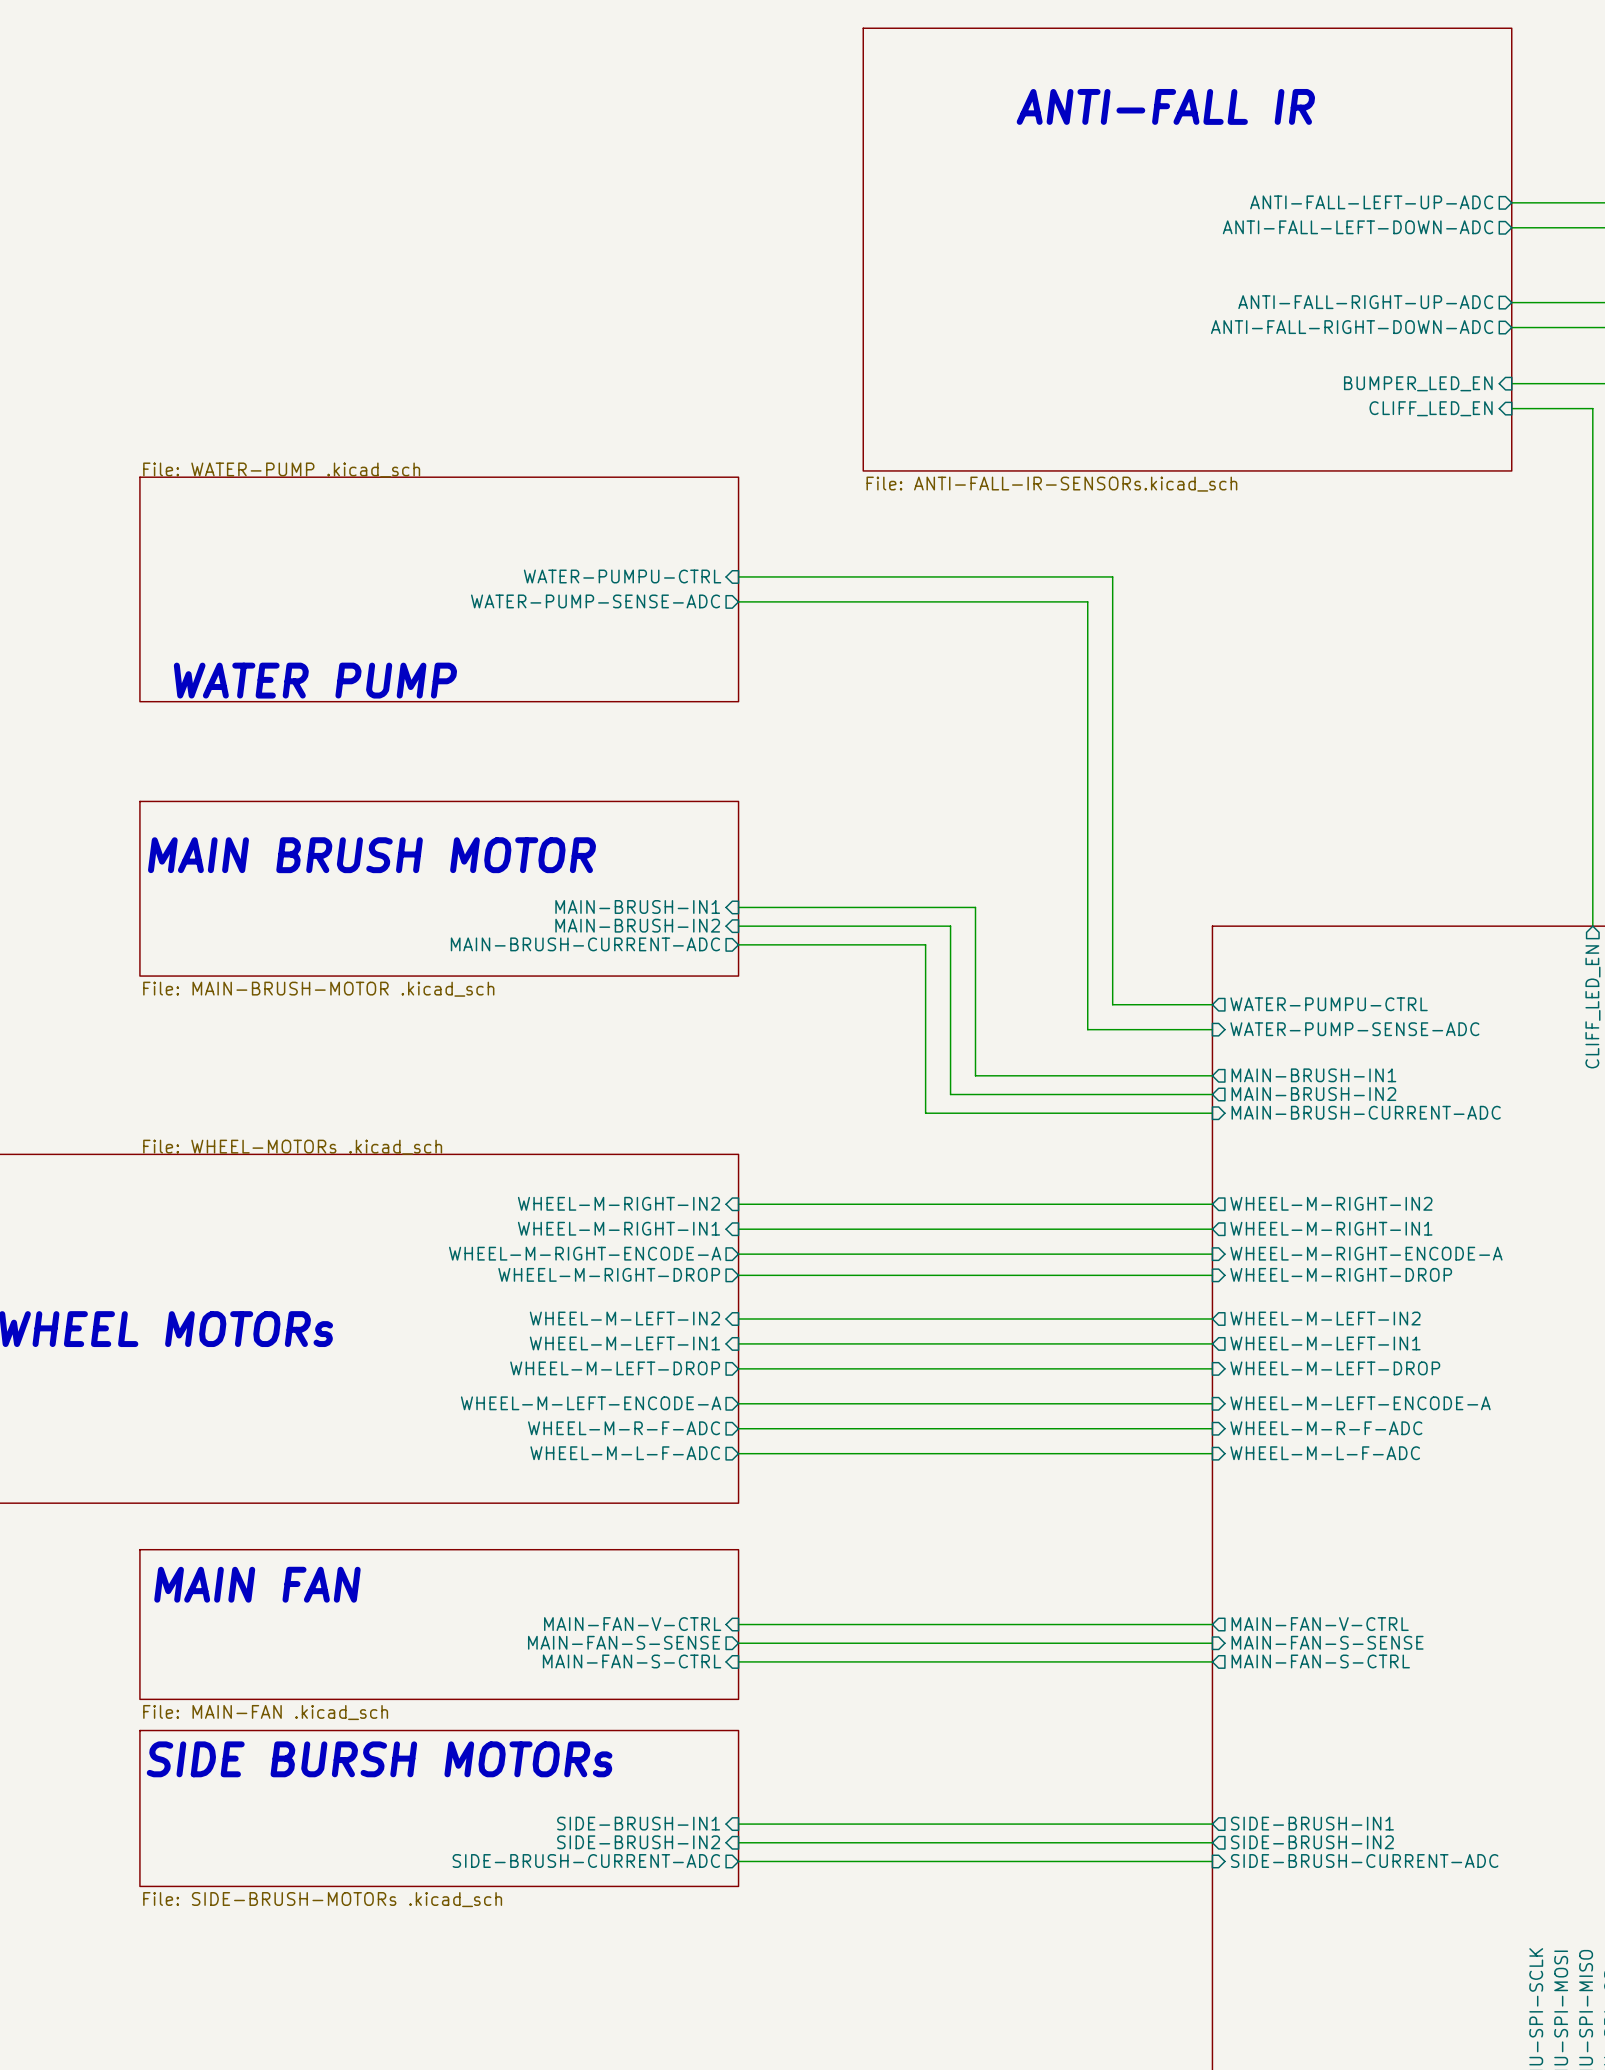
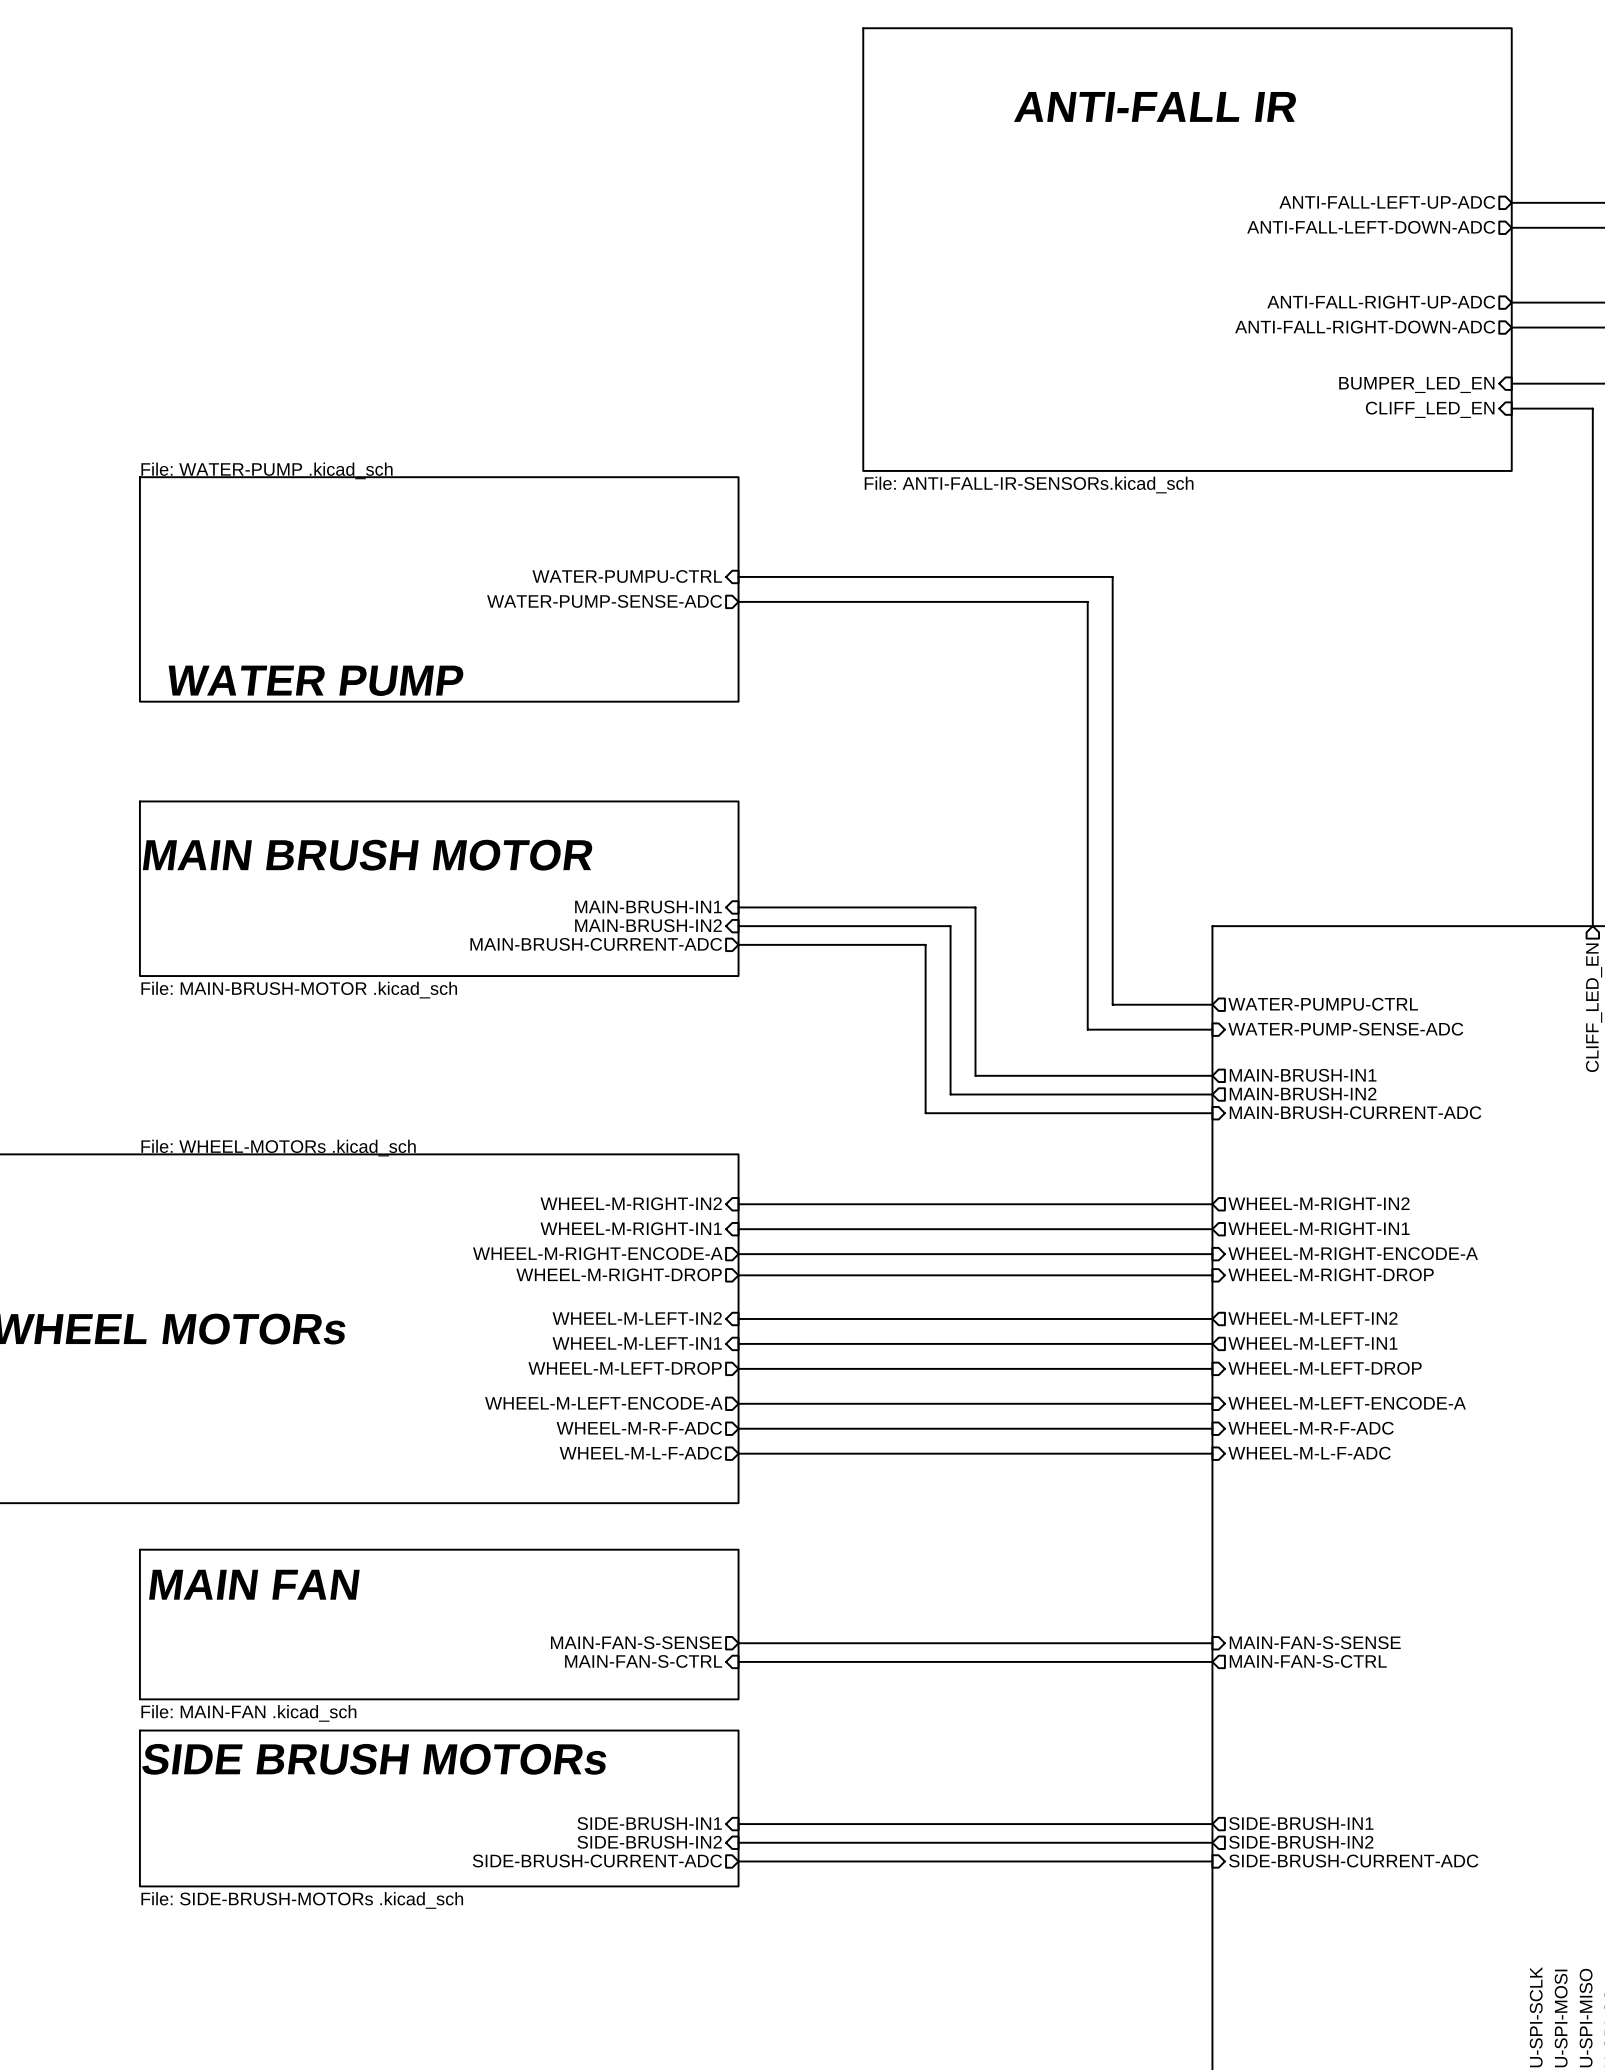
sheet pin: MAIN-FAN-V-CTRL (632, 1624) -> none
wire: (738, 1624) (1212, 1624) -> none
sheet pin: MAIN-FAN-V-CTRL (1320, 1624) -> none
text: SIDE BURSH MOTORs (379, 1759) -> SIDE BRUSH MOTORs (374, 1759)

